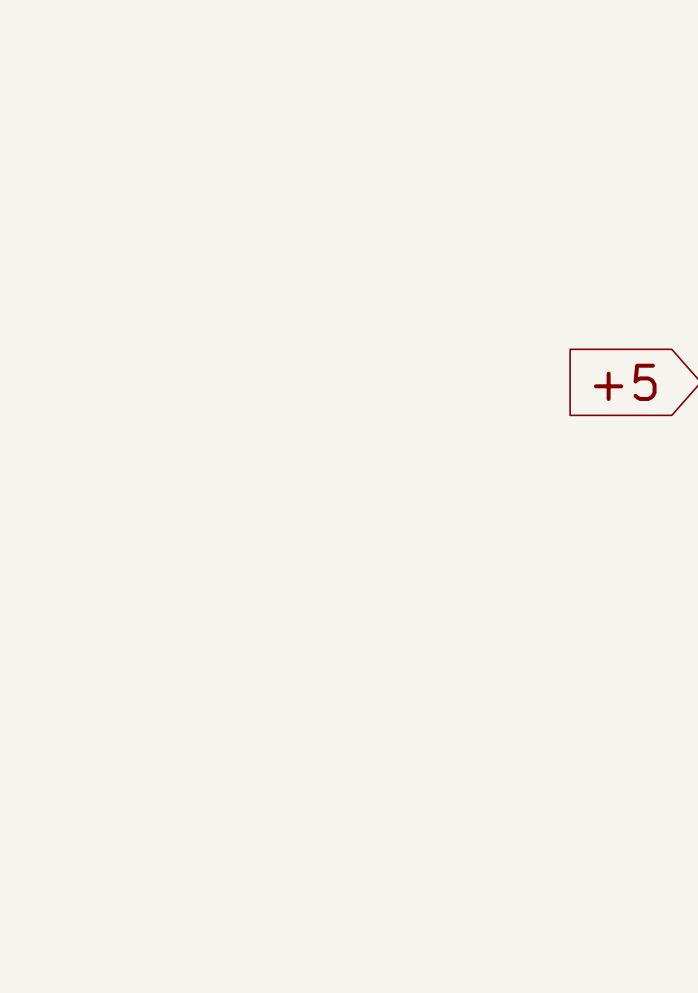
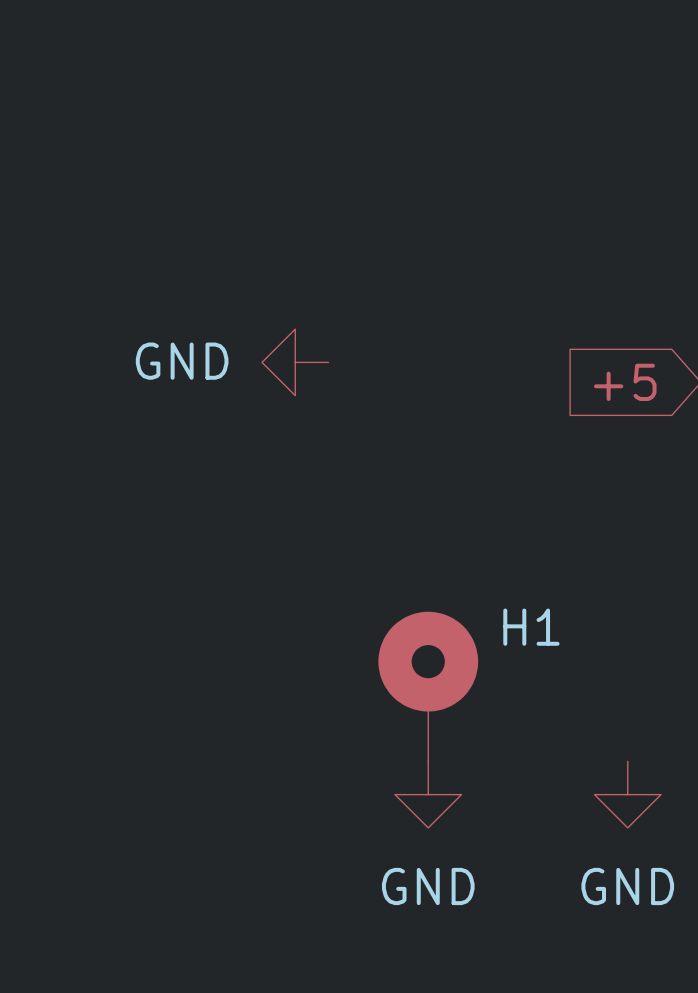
power symbol: none -> GND (295, 362)
H1: none -> (428, 686)
power symbol: none -> GND (428, 794)
power symbol: none -> GND (627, 794)

